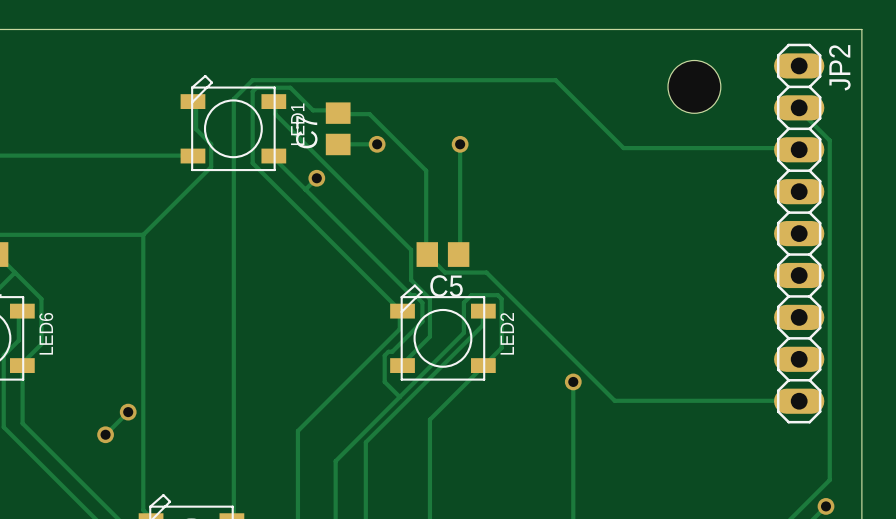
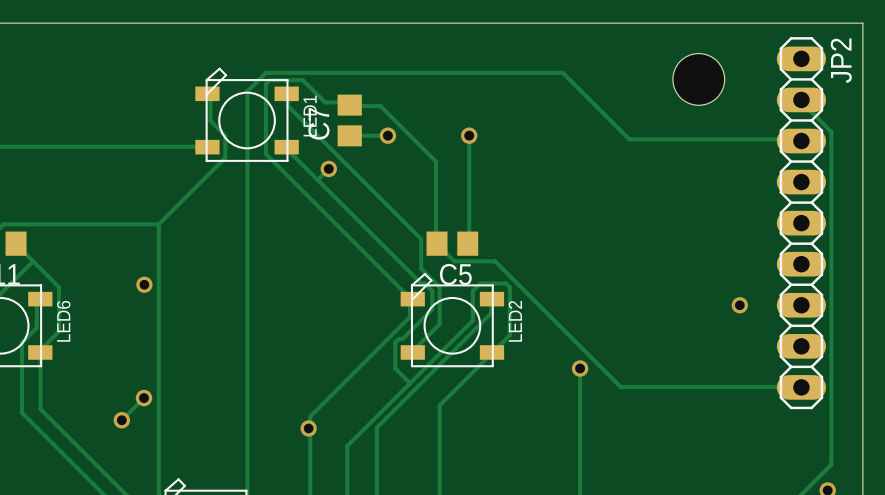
via: none -> (144, 284)
via: none -> (739, 305)
via: none -> (308, 428)

